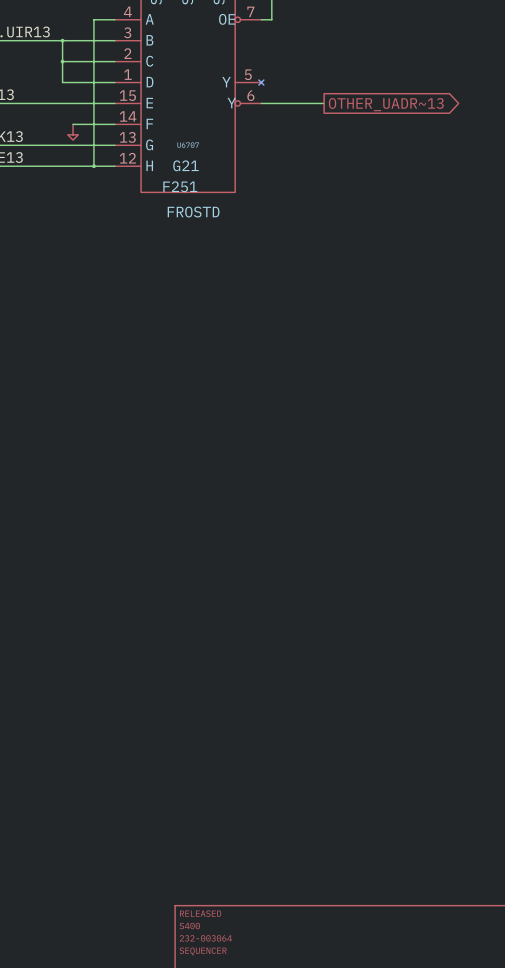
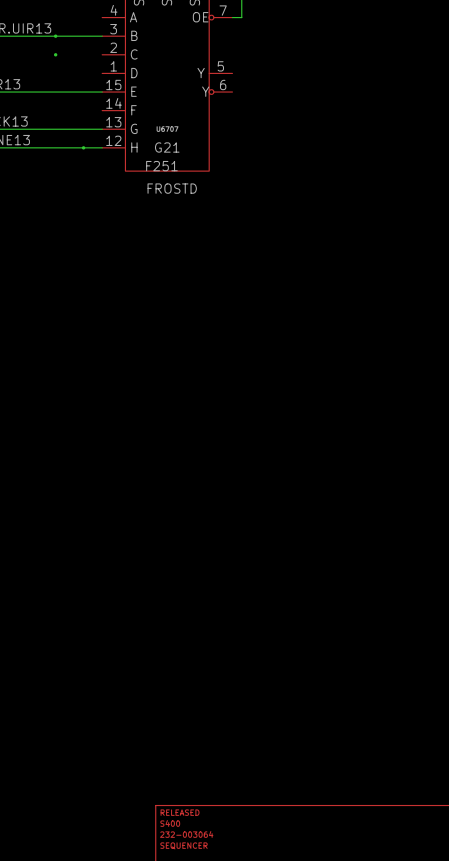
wire: (114, 19) (93, 19) (93, 166) -> none
wire: (62, 40) (62, 82) (114, 82) -> none
wire: (62, 61) (114, 61) -> none
no-connect mark: (261, 82) -> none
wire: (261, 103) (324, 103) -> none
global label: OTHER_UADR~13 (386, 104) -> none
wire: (73, 124) (114, 124) -> none
power symbol: (73, 132) -> none

